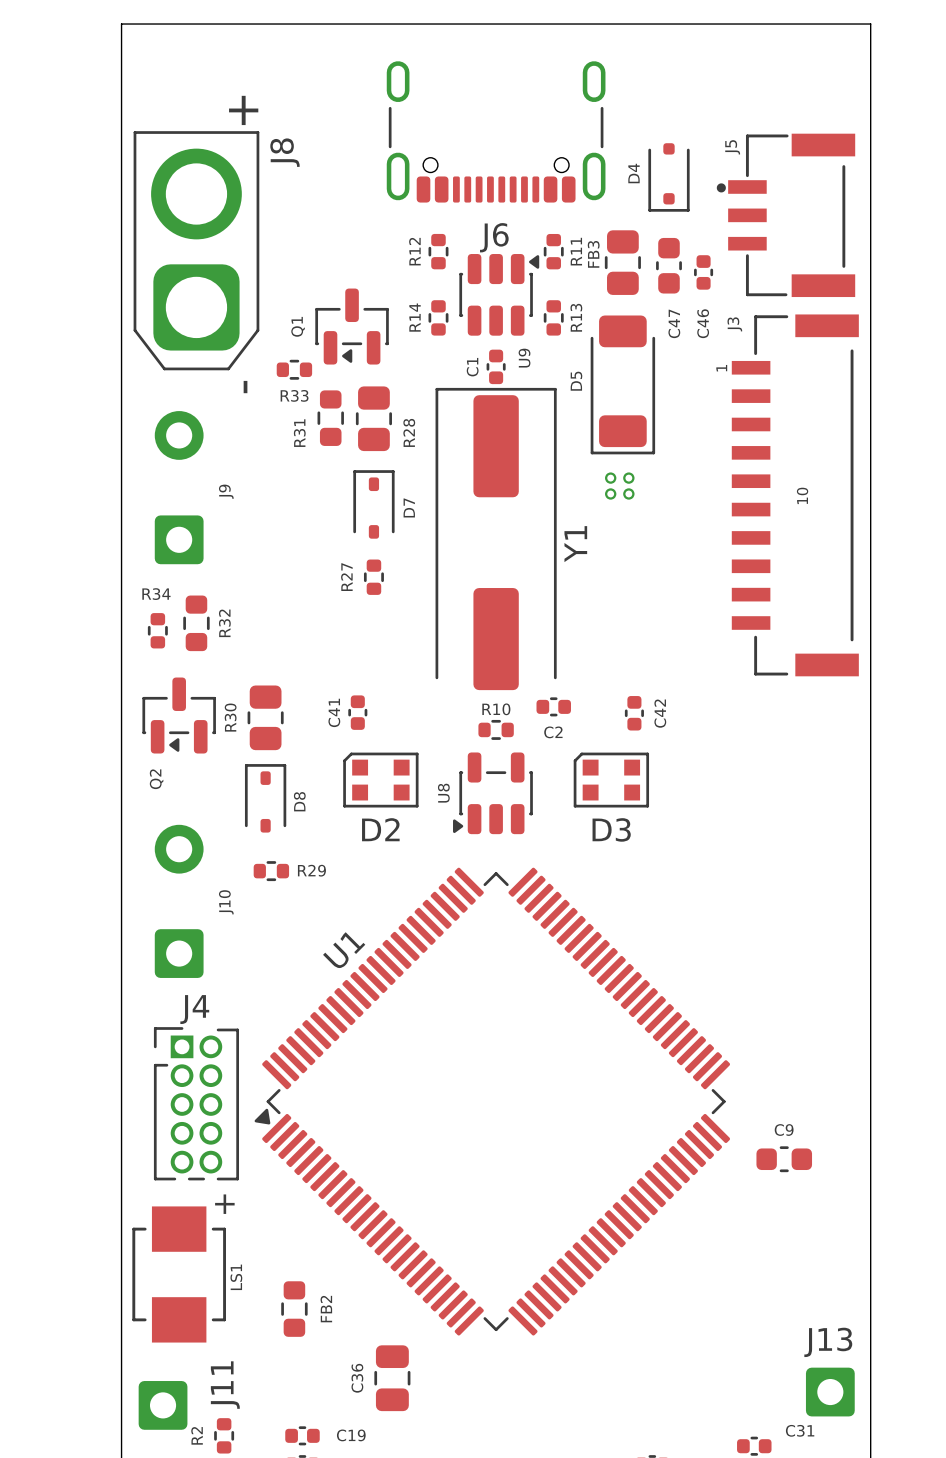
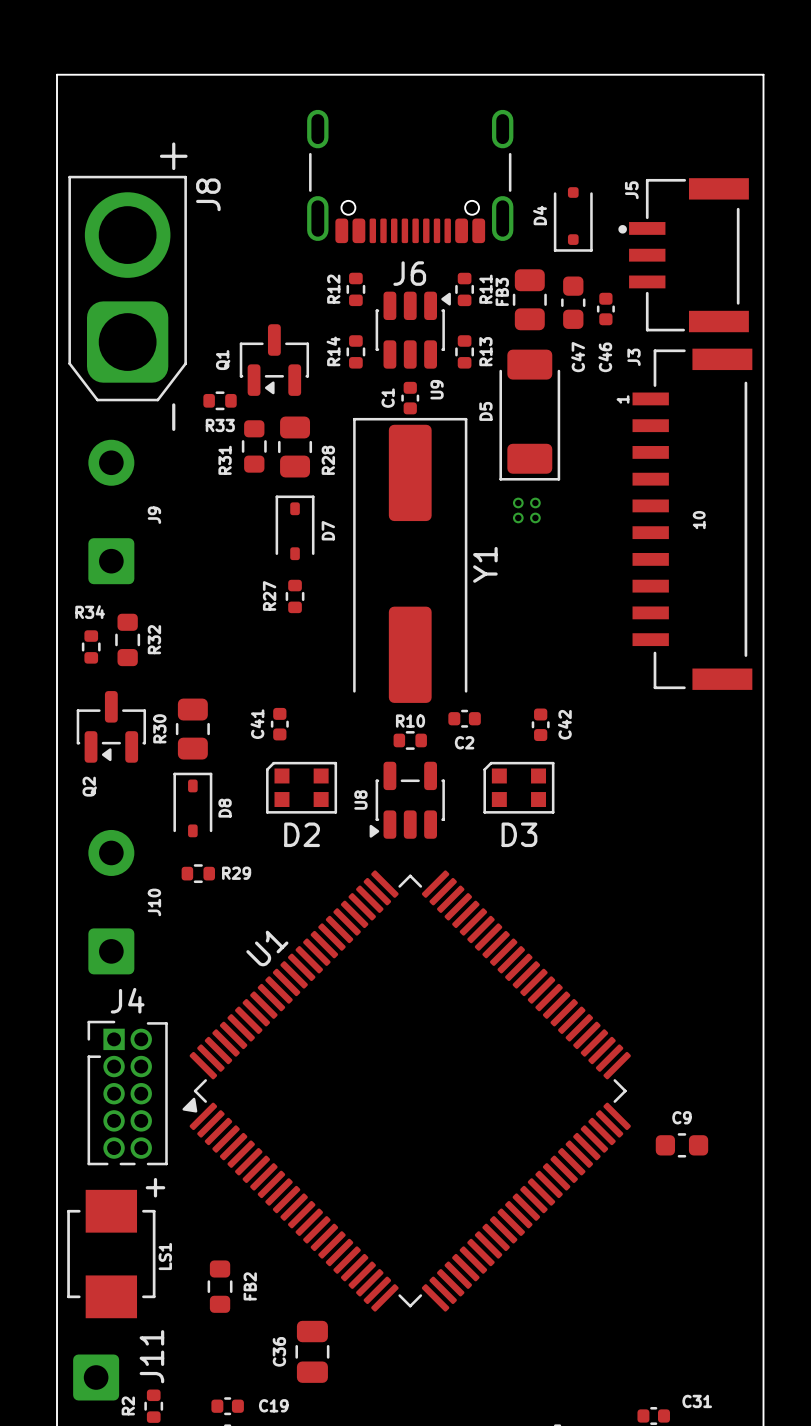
J13: (830, 1392) -> none

